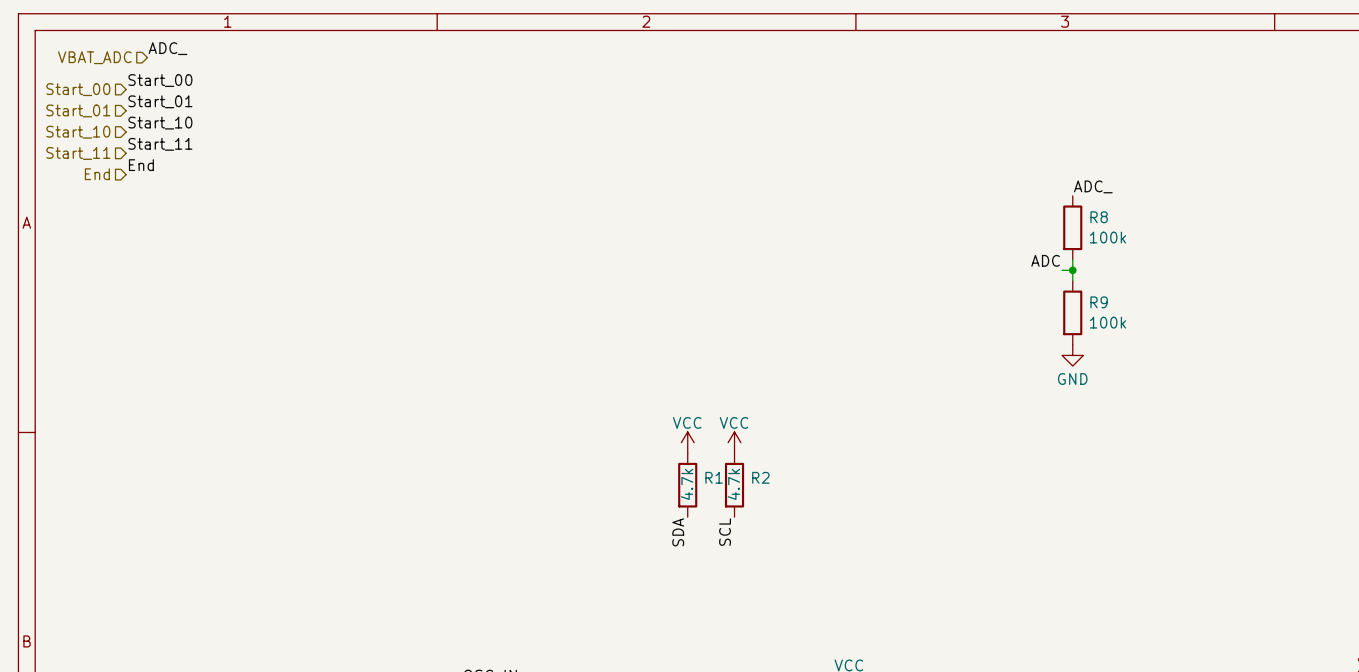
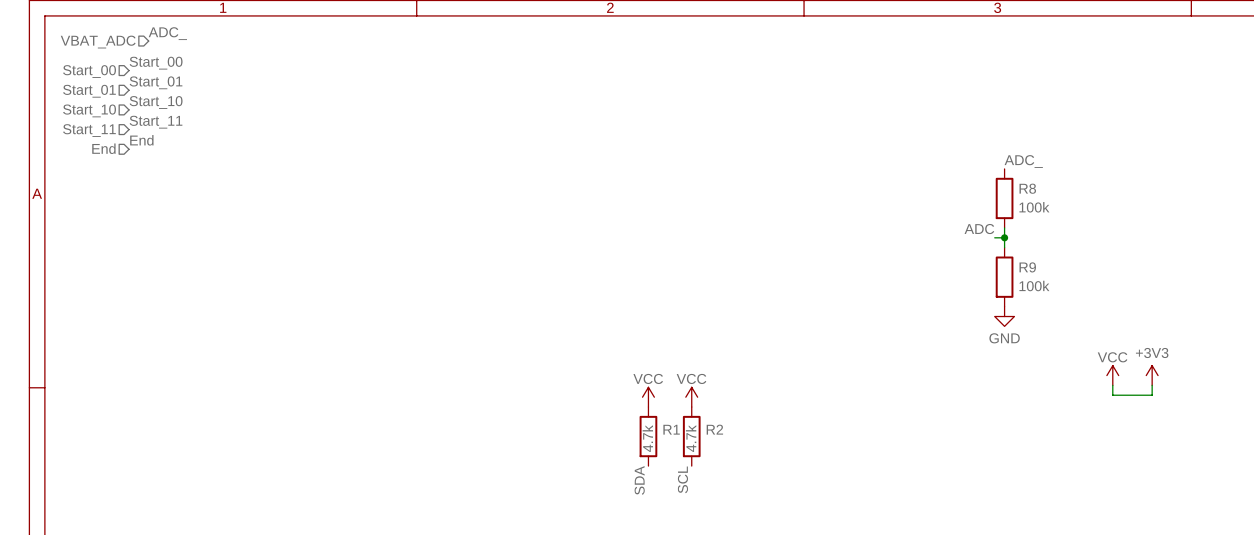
power symbol: none -> VCC (1112, 375)
power symbol: none -> +3V3 (1152, 375)
wire: none -> (1112, 385) (1112, 395) (1152, 395) (1152, 385)

